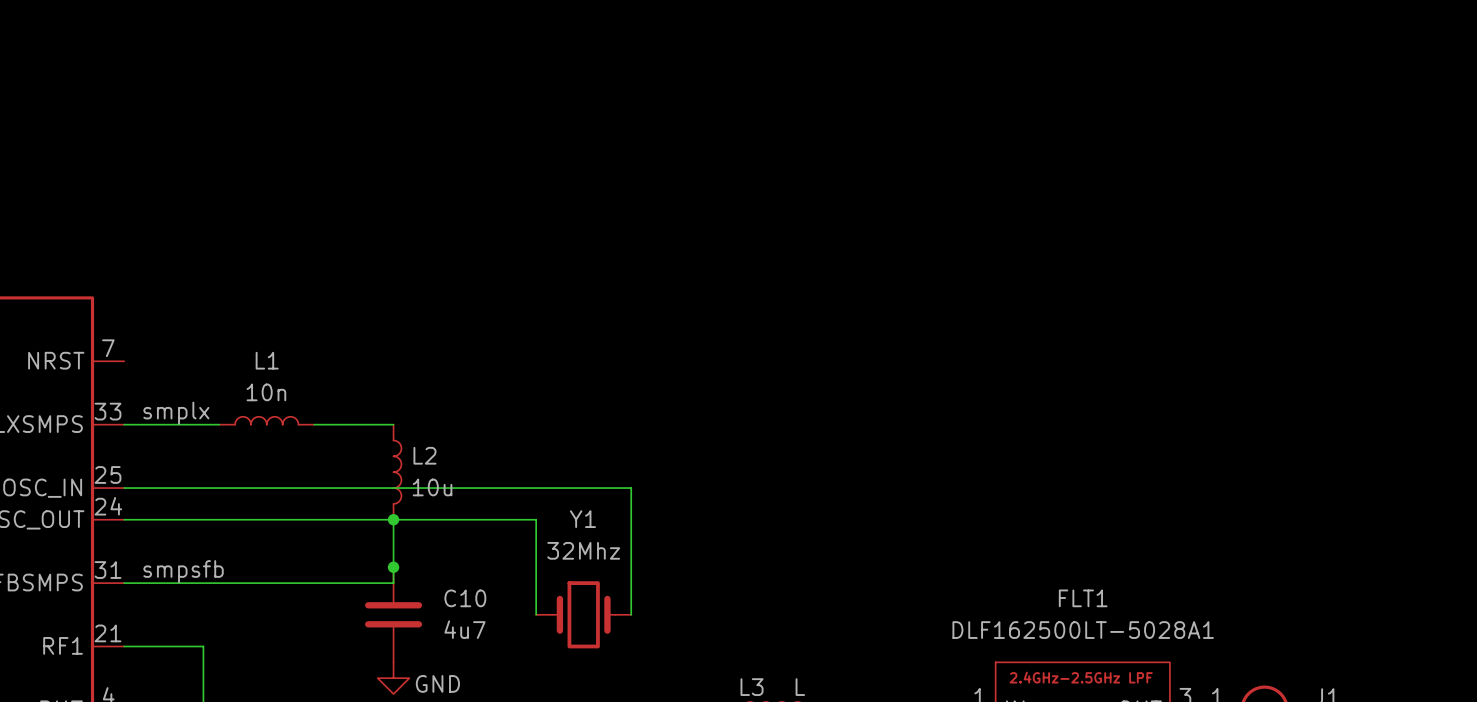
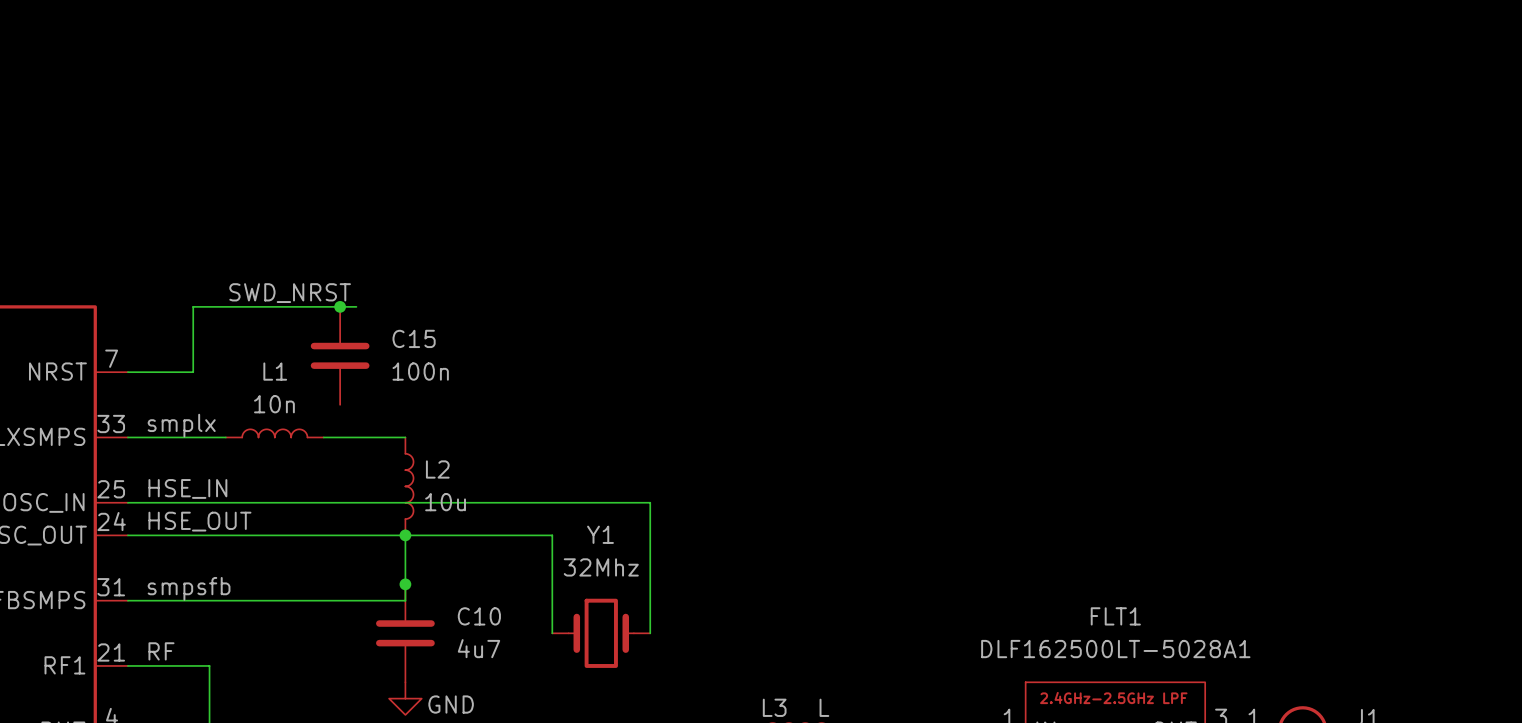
label: none -> SWD_NRST (290, 293)
junction: none -> (340, 306)
wire: none -> (356, 306) (193, 306) (193, 372) (127, 372)
C15: none -> 100n (340, 355)
label: none -> HSE_IN (187, 488)
label: none -> HSE_OUT (199, 521)
label: none -> RF (161, 651)

